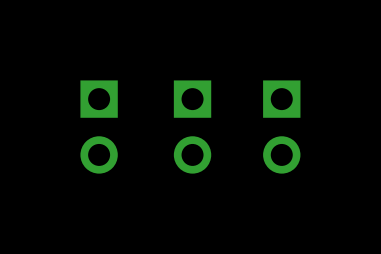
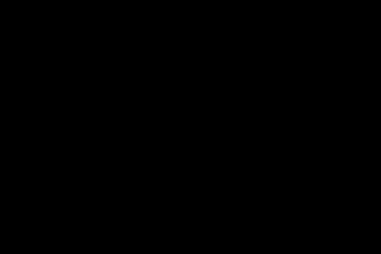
part: (99, 127) -> none
part: (192, 127) -> none
part: (281, 127) -> none

